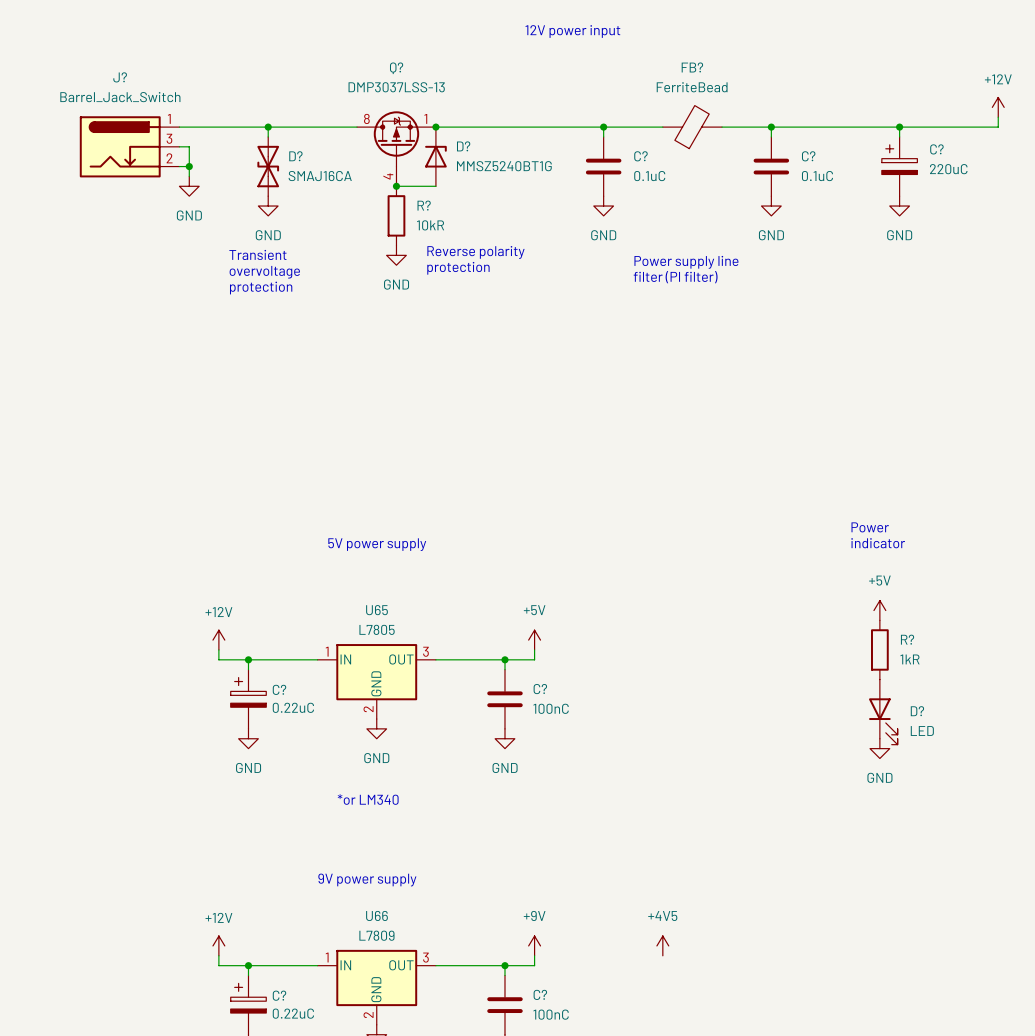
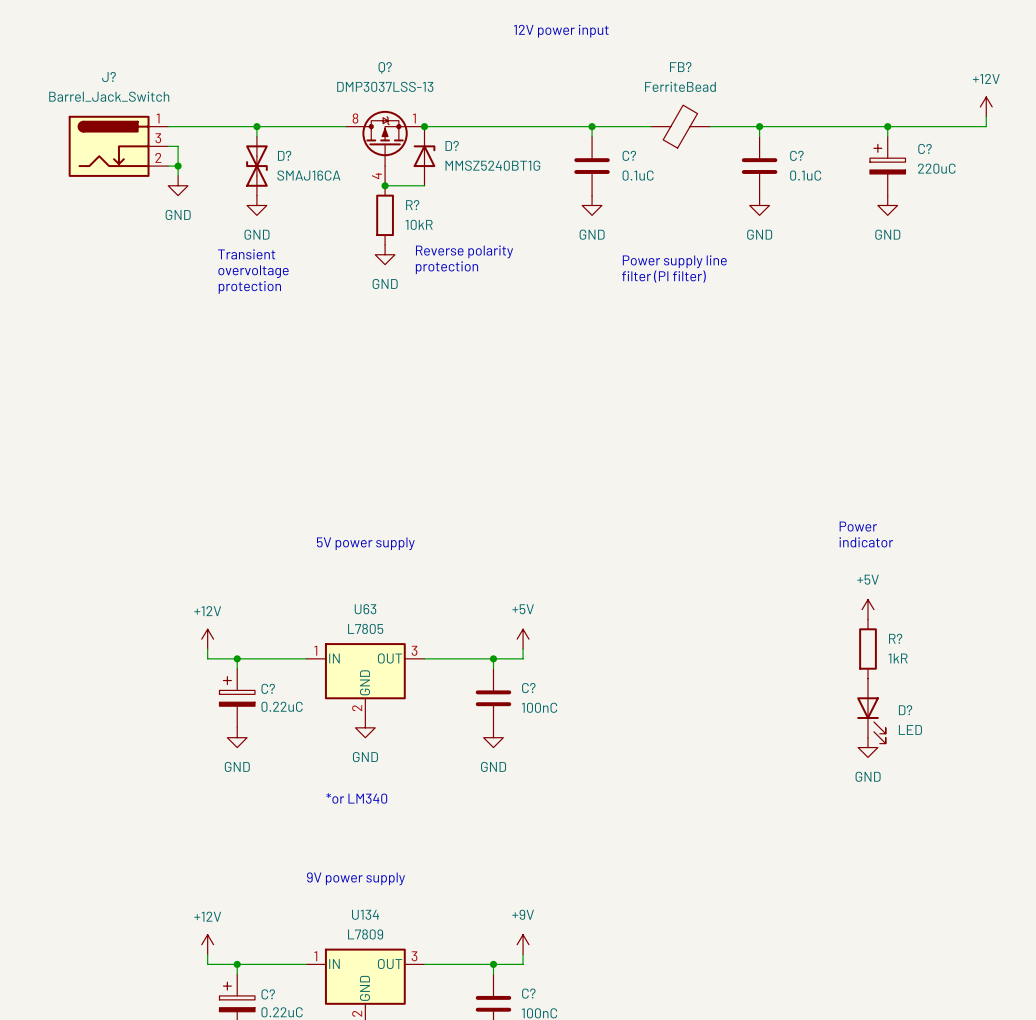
U65 name: U65 (376, 610) -> U63 (365, 609)
U66 name: U66 (376, 915) -> U134 (365, 914)
power symbol: +4V5 (662, 945) -> none

